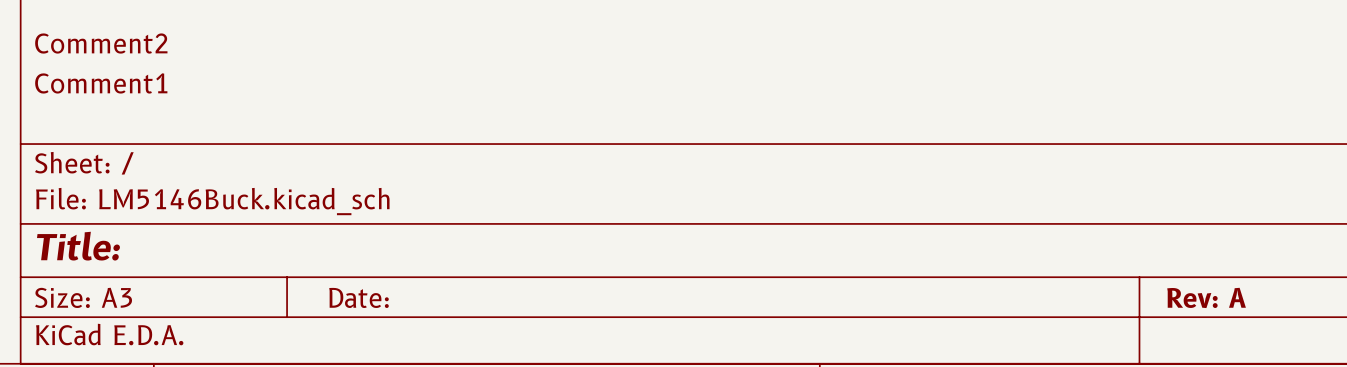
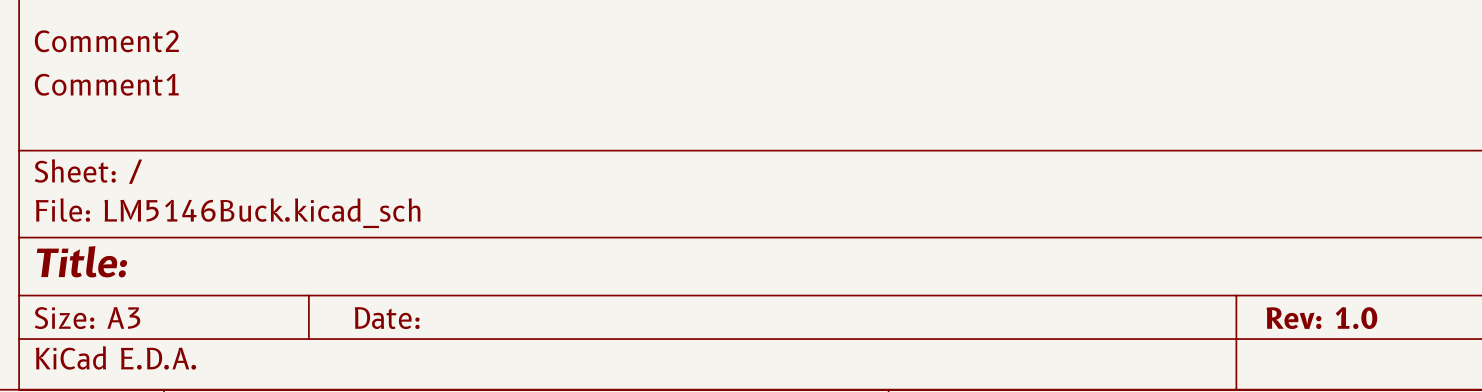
title block: Rev: A (1206, 297) -> Rev: 1.0 (1321, 318)

